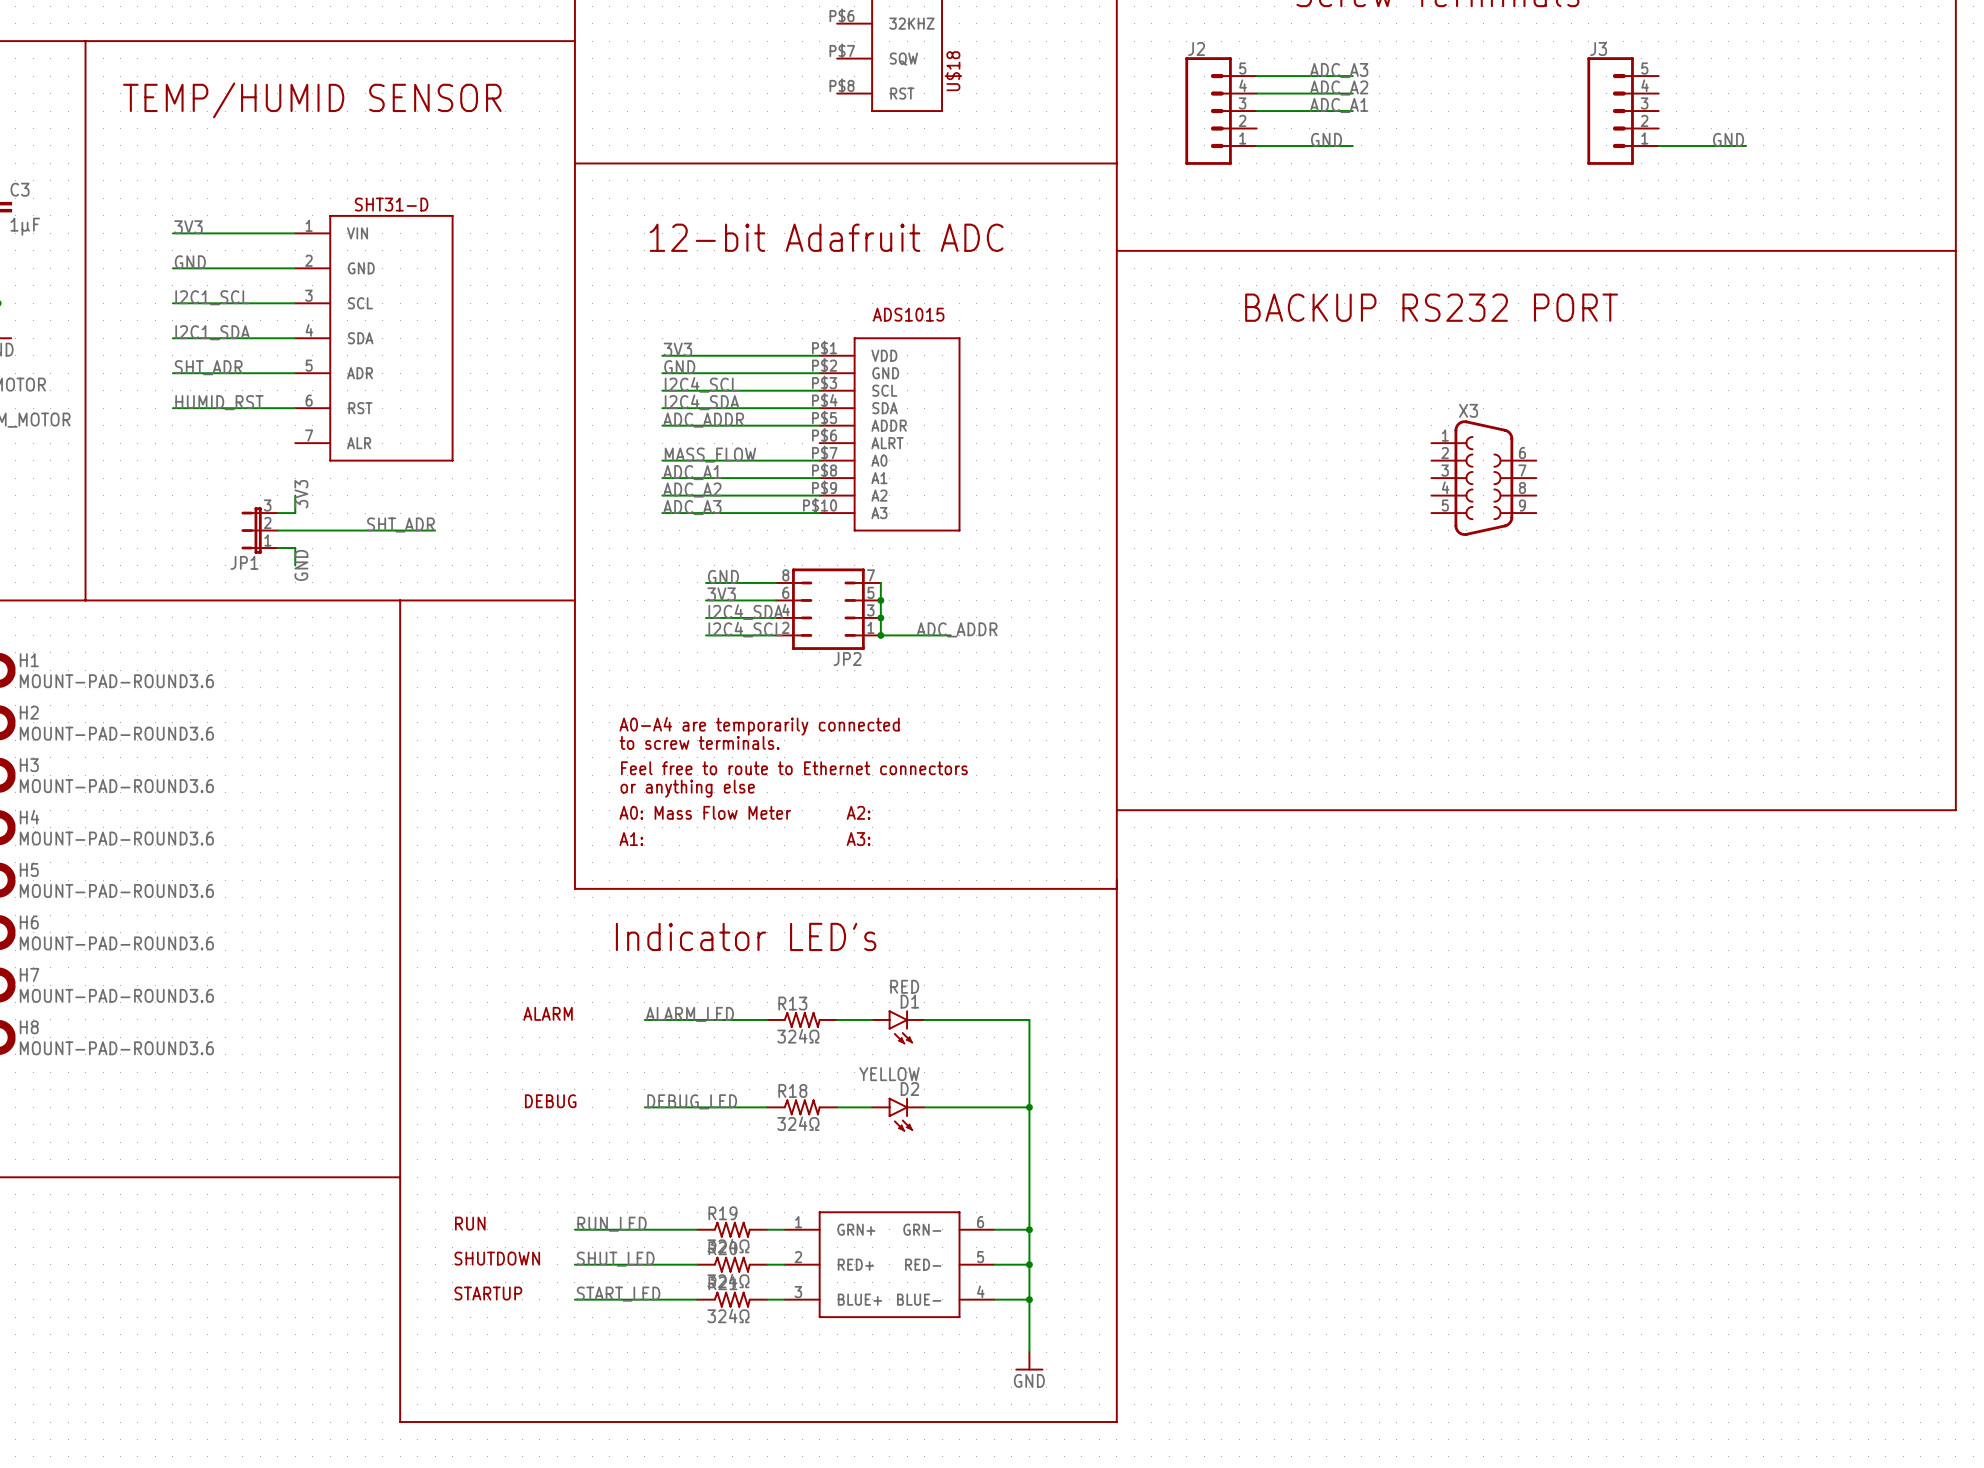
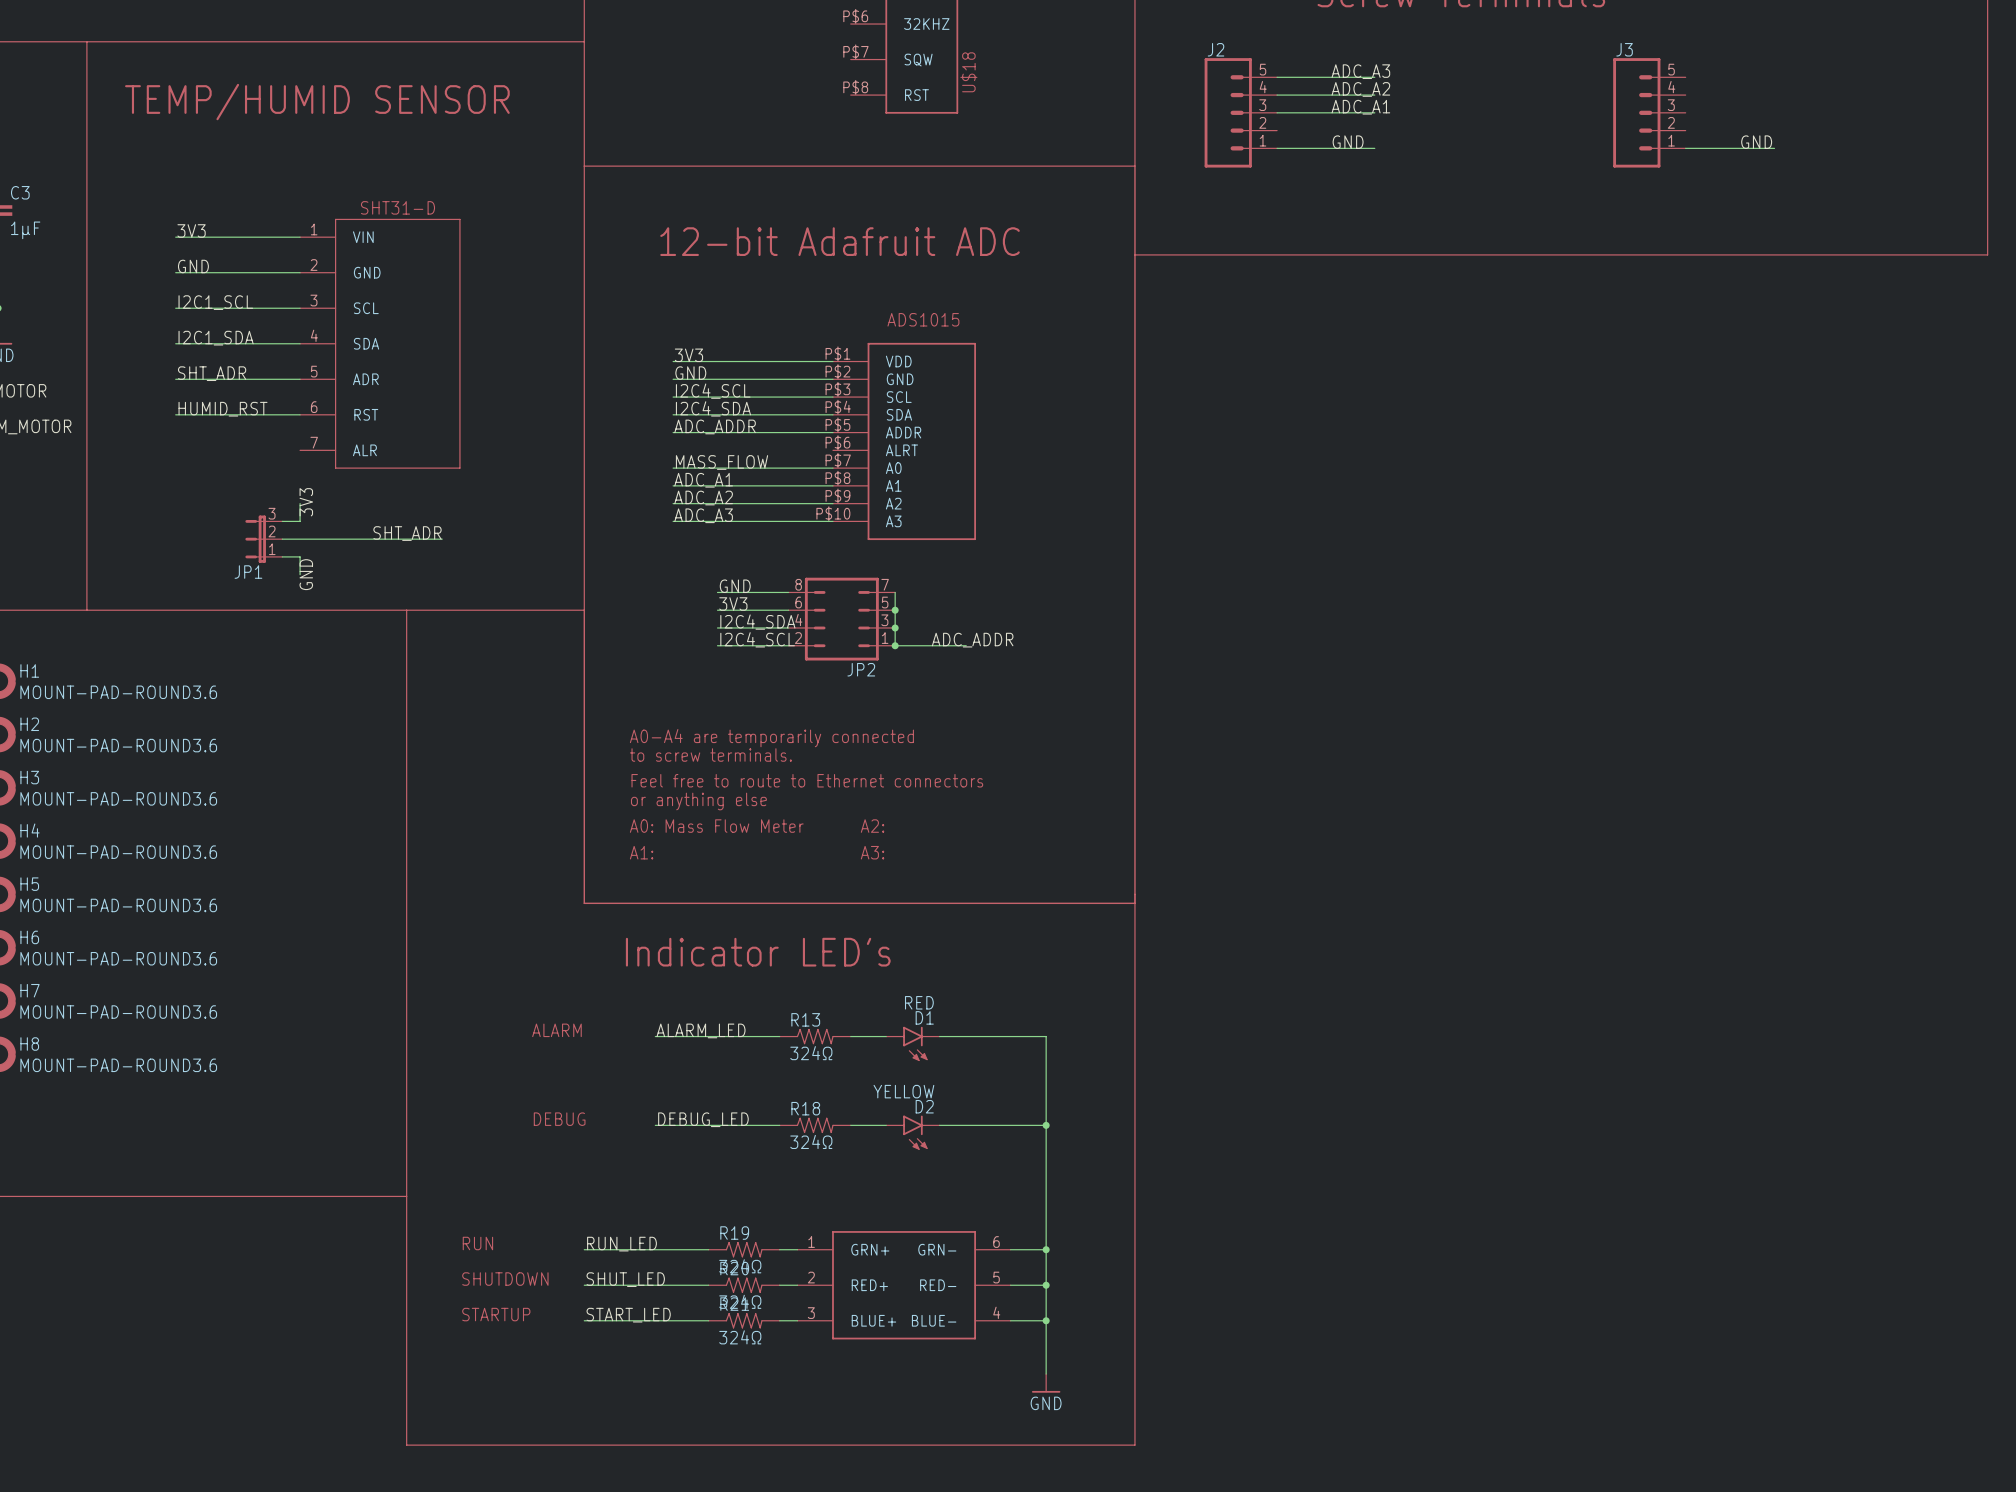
line: (1955, 250) (1955, 810) (1116, 810) -> none
text: BACKUP RS232 PORT (1431, 307) -> none
X3: (1483, 478) -> none

